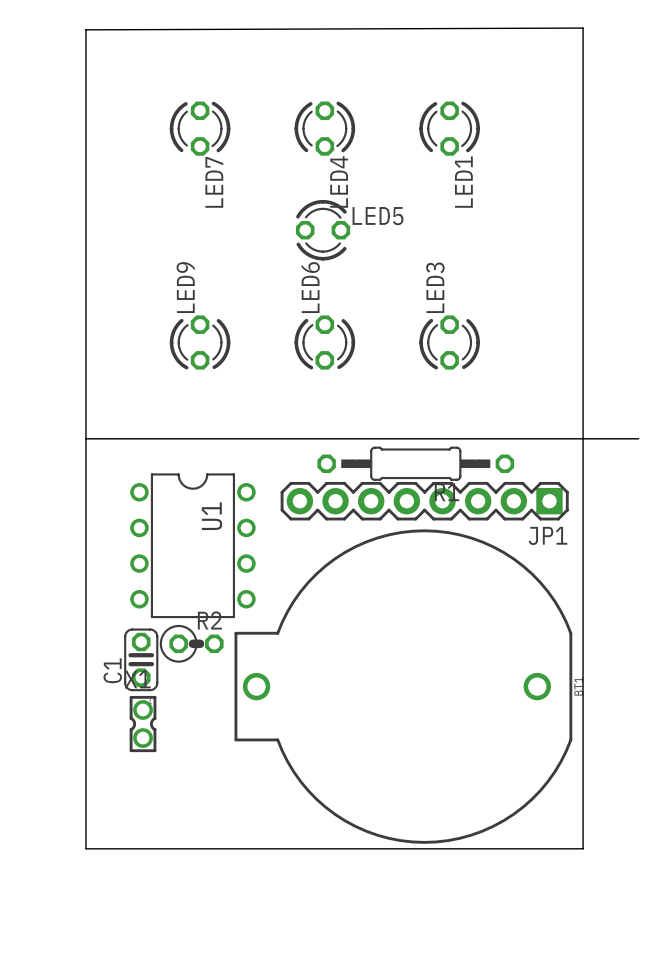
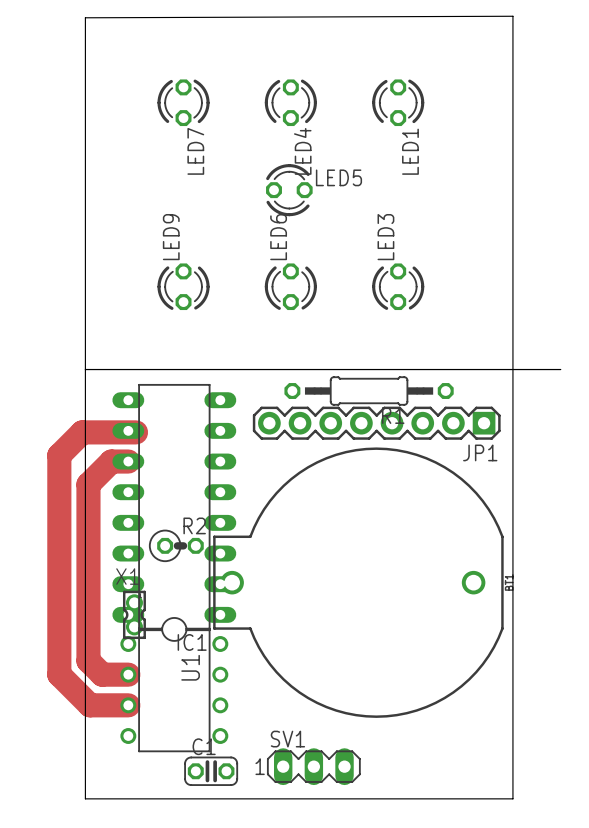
track: none -> (136, 432) (82, 432) (59, 455) (59, 674) (90, 705) (128, 705)
track: none -> (128, 461) (111, 461) (88, 484) (88, 660) (102, 674) (128, 674)
U1 position: (192, 545) -> (174, 690)
IC1: none -> (174, 507)
C1 rotation: 0° (141, 659) -> 90° clockwise (211, 771)
C1 position: (141, 659) -> (211, 771)
board edge: (85, 848) (583, 848) -> (85, 722) (85, 798) (512, 798) (512, 722)
SV1: none -> (313, 766)

